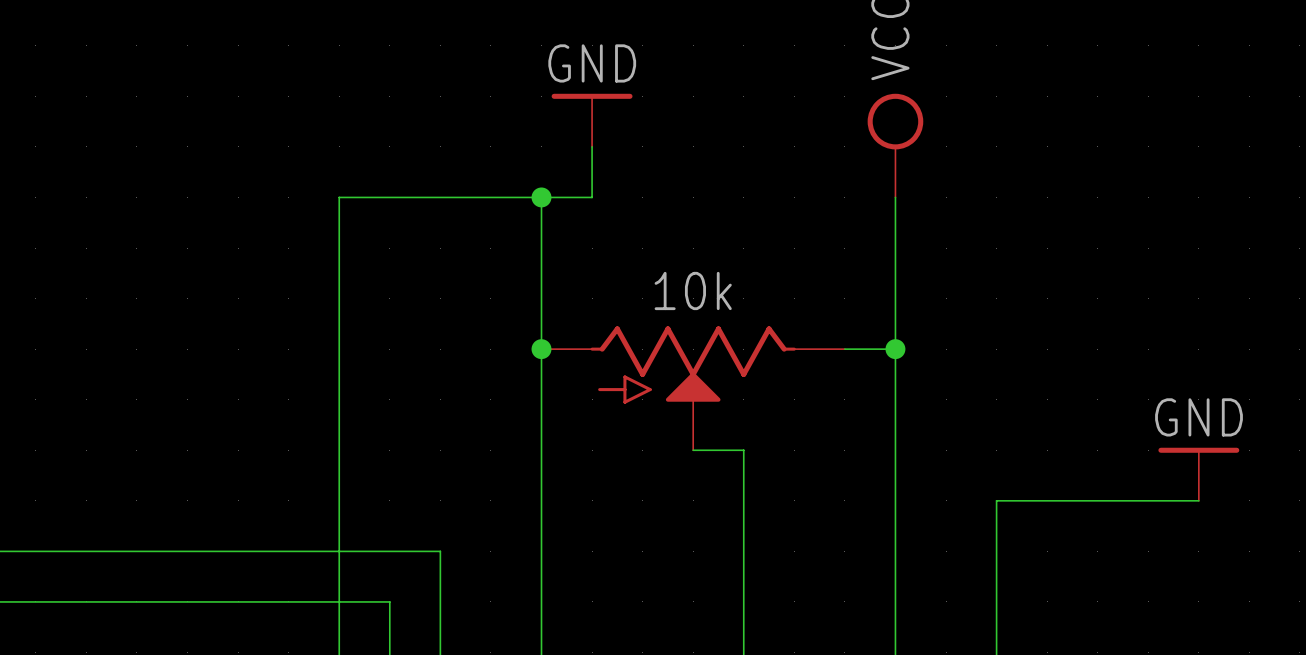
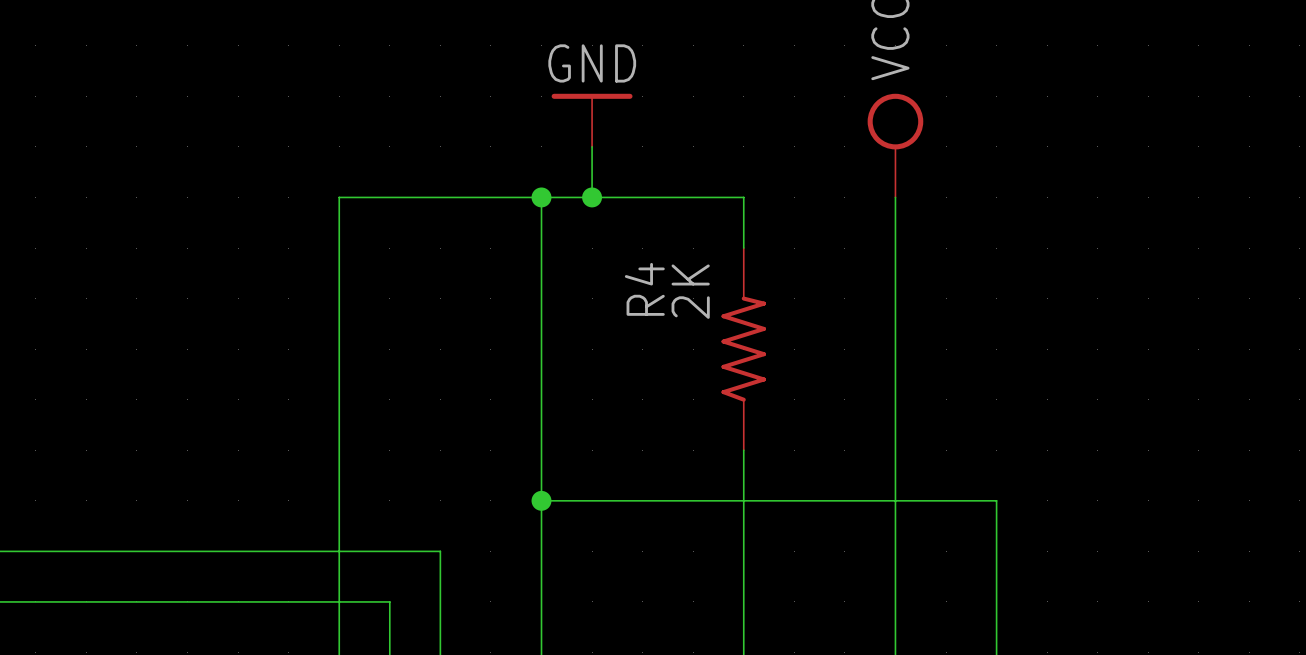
wire: none -> (592, 197) (743, 197) (743, 248)
junction: none -> (592, 197)
junction: (541, 349) -> none
R4: none -> 2K (743, 349)
wire: (844, 349) (895, 349) -> none
junction: (895, 349) -> none
part: 10k (693, 388) -> none
wire: (693, 450) (743, 450) -> none
power symbol: GND (1198, 474) -> none
junction: none -> (541, 500)
wire: (996, 500) (1198, 500) -> (996, 500) (541, 500)

